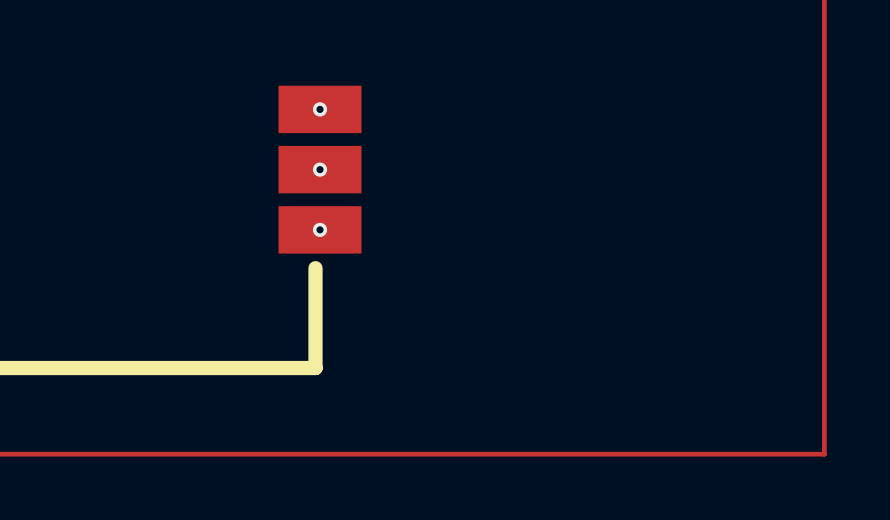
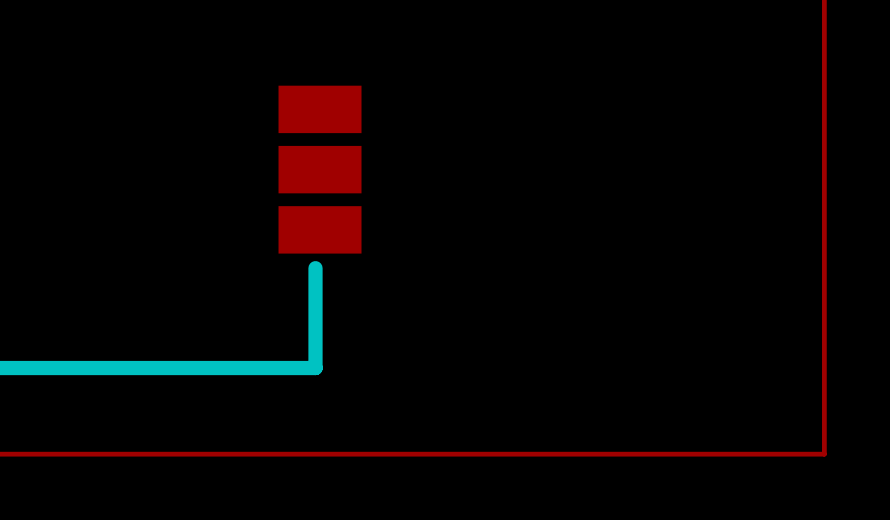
via: (320, 109) -> none
via: (320, 169) -> none
via: (320, 229) -> none

